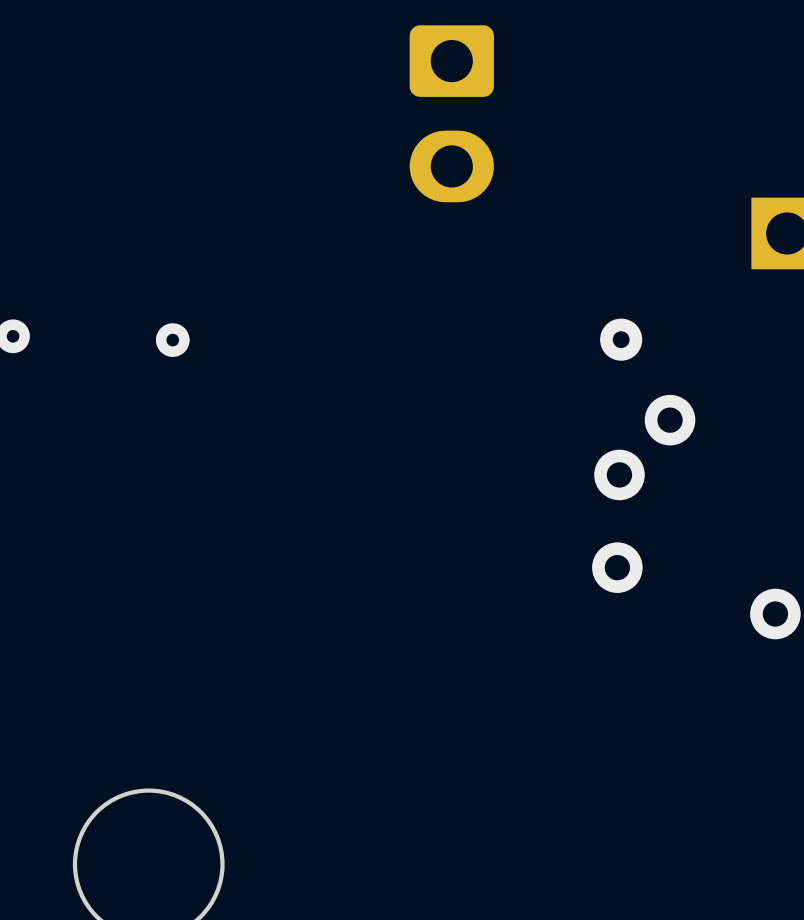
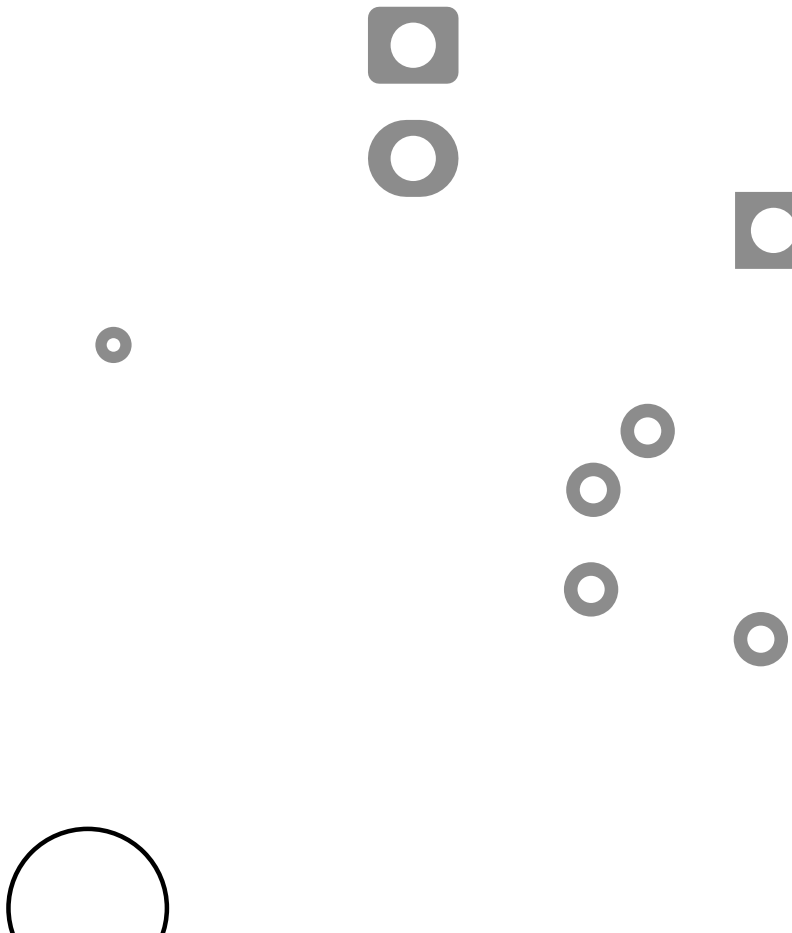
via: (621, 339) -> none

